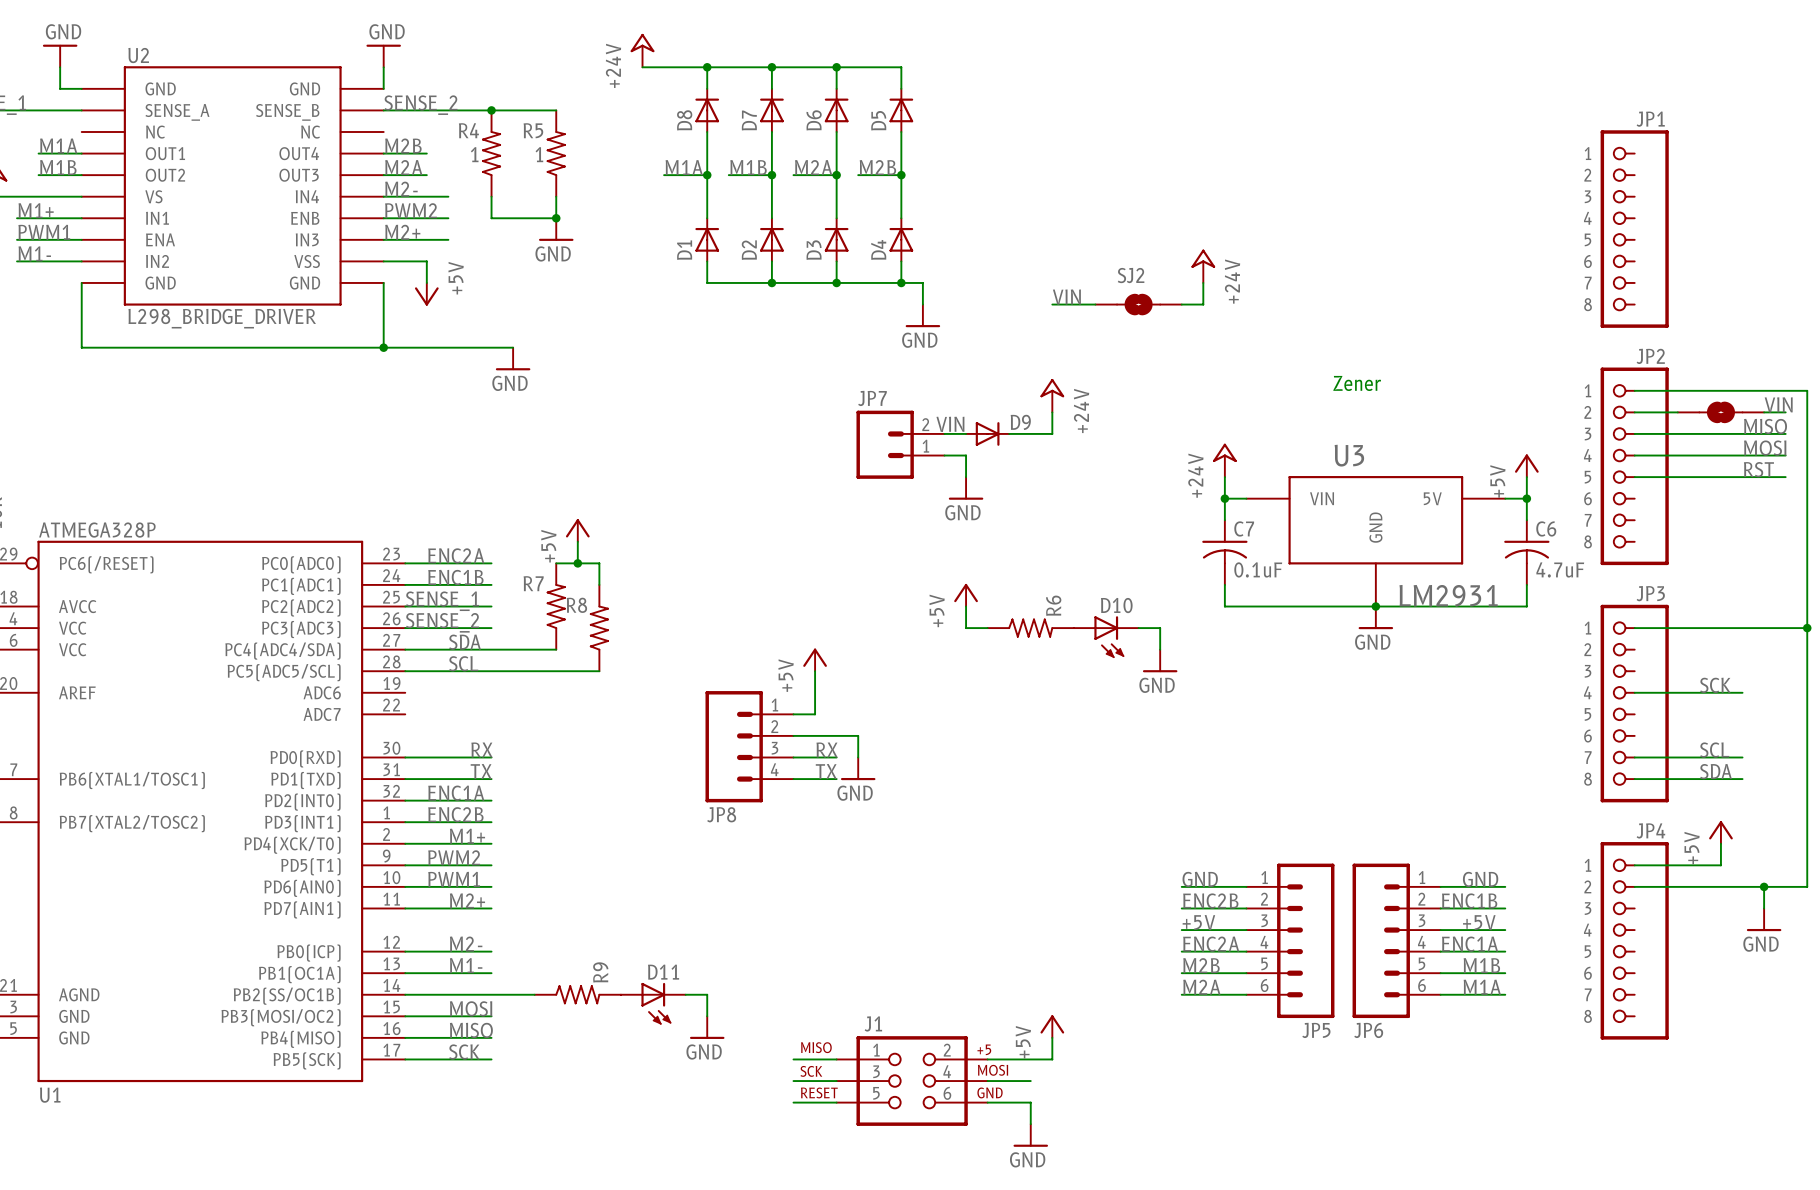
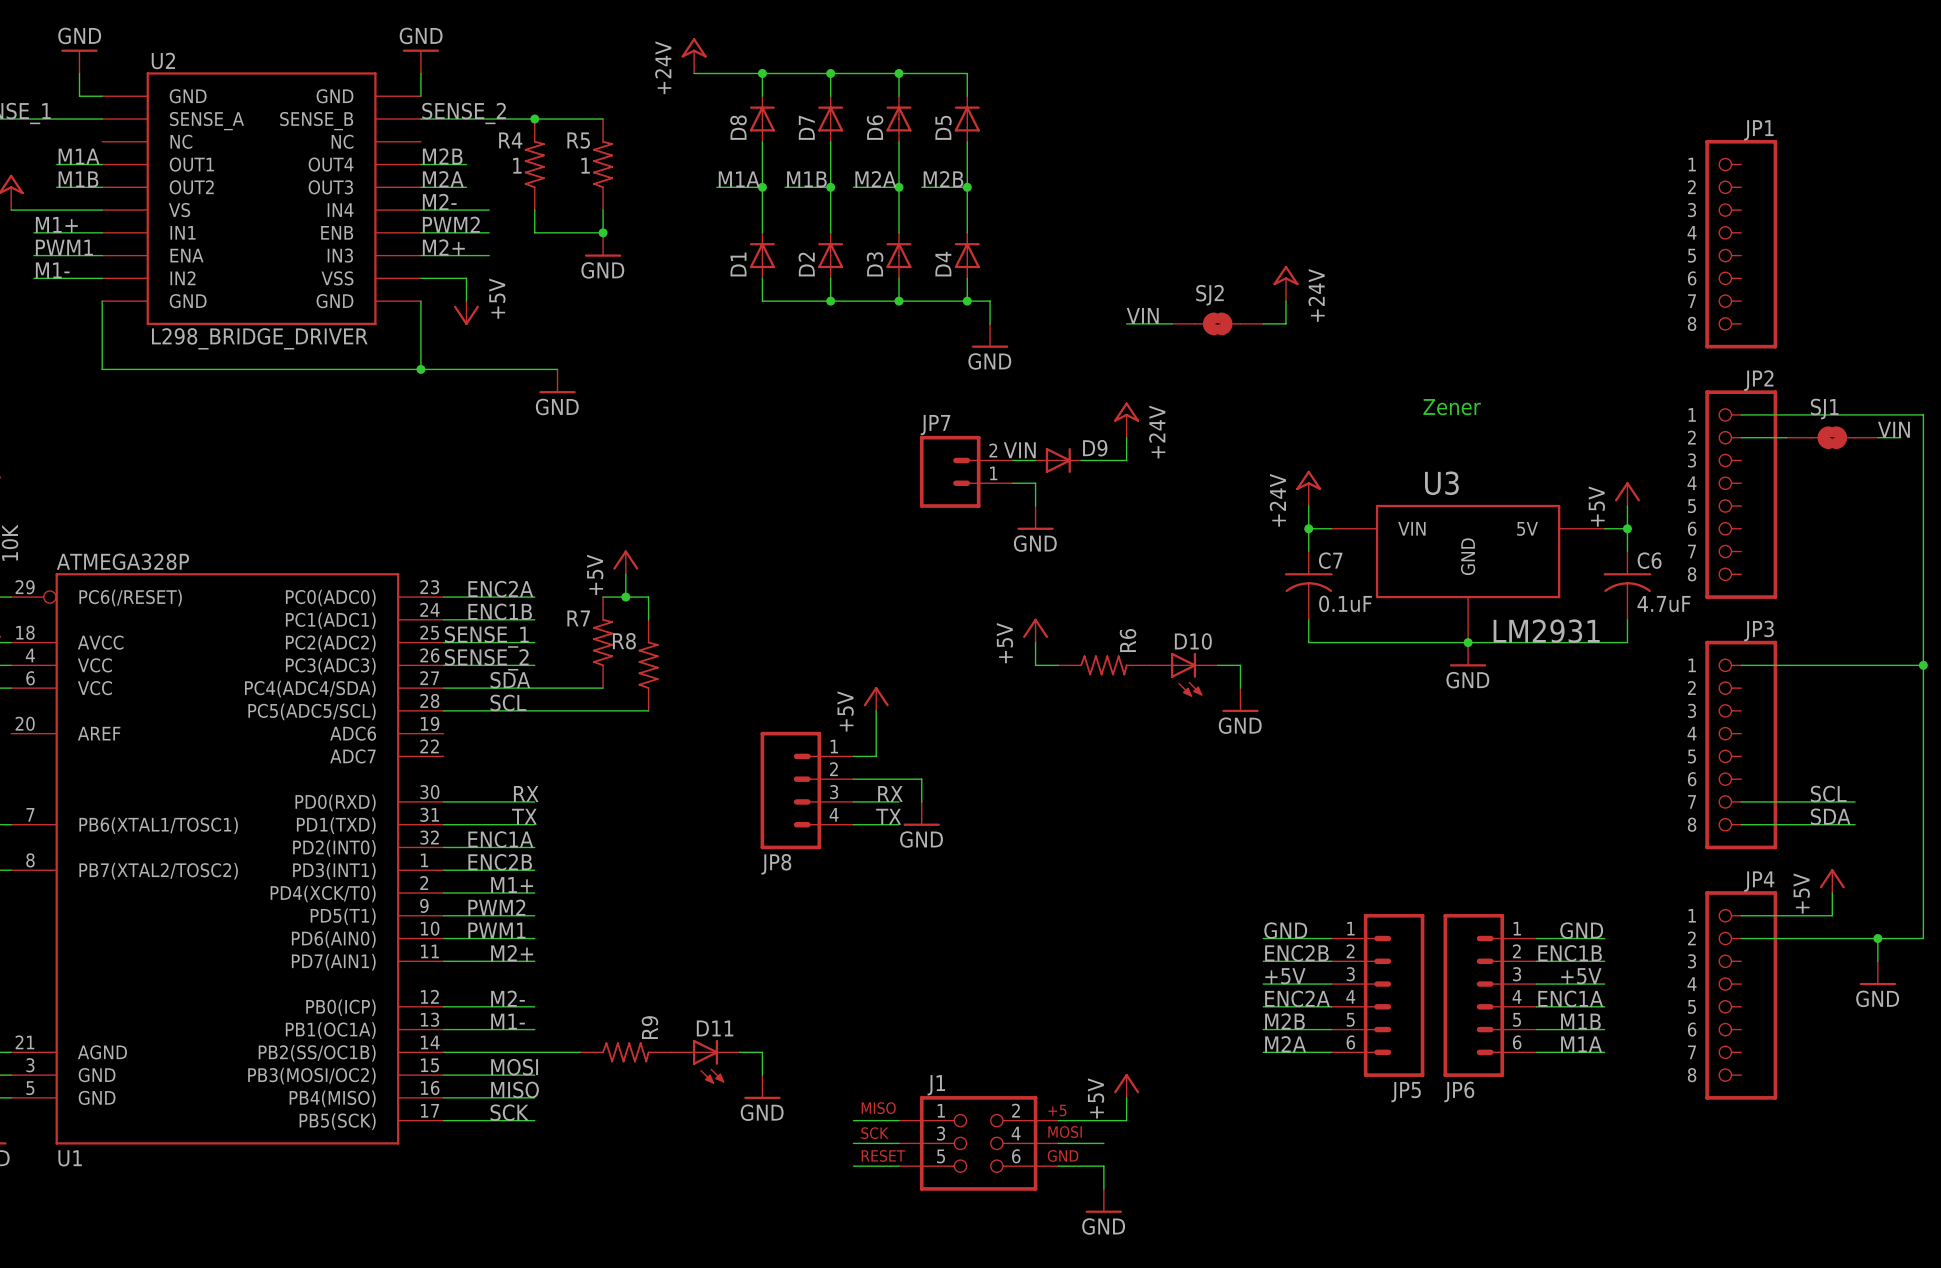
SJ1 name: none -> SJ1 (1824, 409)
label: MISO (1765, 426) -> none
wire: (1634, 433) (1785, 433) -> none
label: MOSI (1765, 448) -> none
wire: (1634, 455) (1785, 455) -> none
label: RST (1758, 469) -> none
wire: (1634, 477) (1785, 477) -> none
label: SCK (1715, 685) -> none
wire: (1634, 692) (1742, 692) -> none

